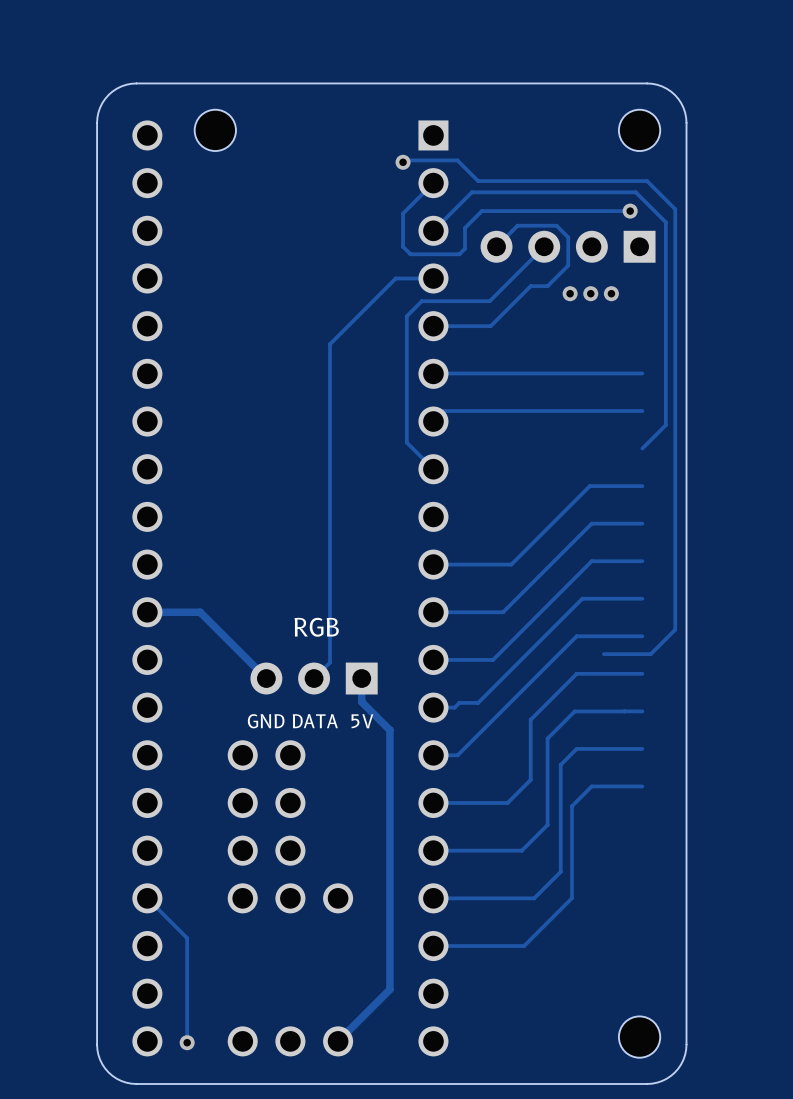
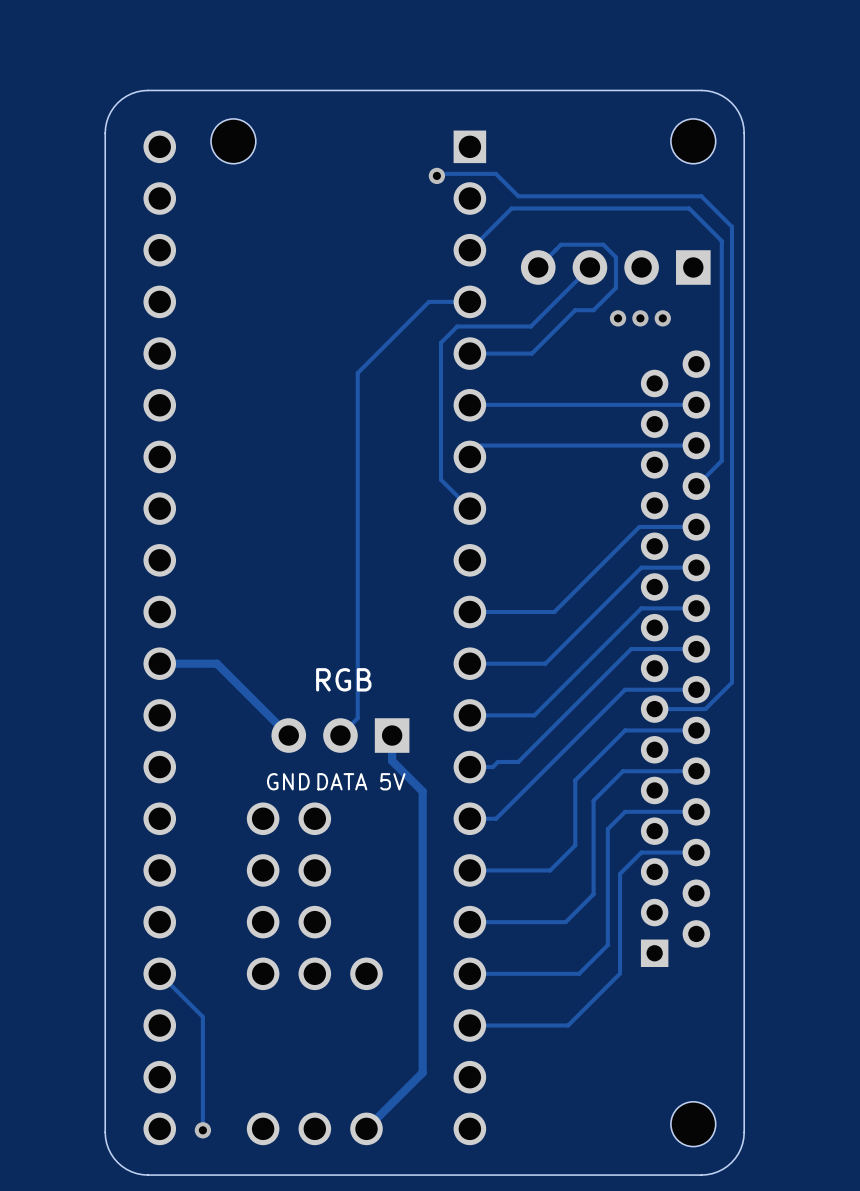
track: (433, 183) (403, 213) (403, 246) (410, 254) (459, 254) (464, 248) (464, 227) (481, 211) (630, 211) -> none
via: (630, 211) -> none
part: none -> (675, 658)

